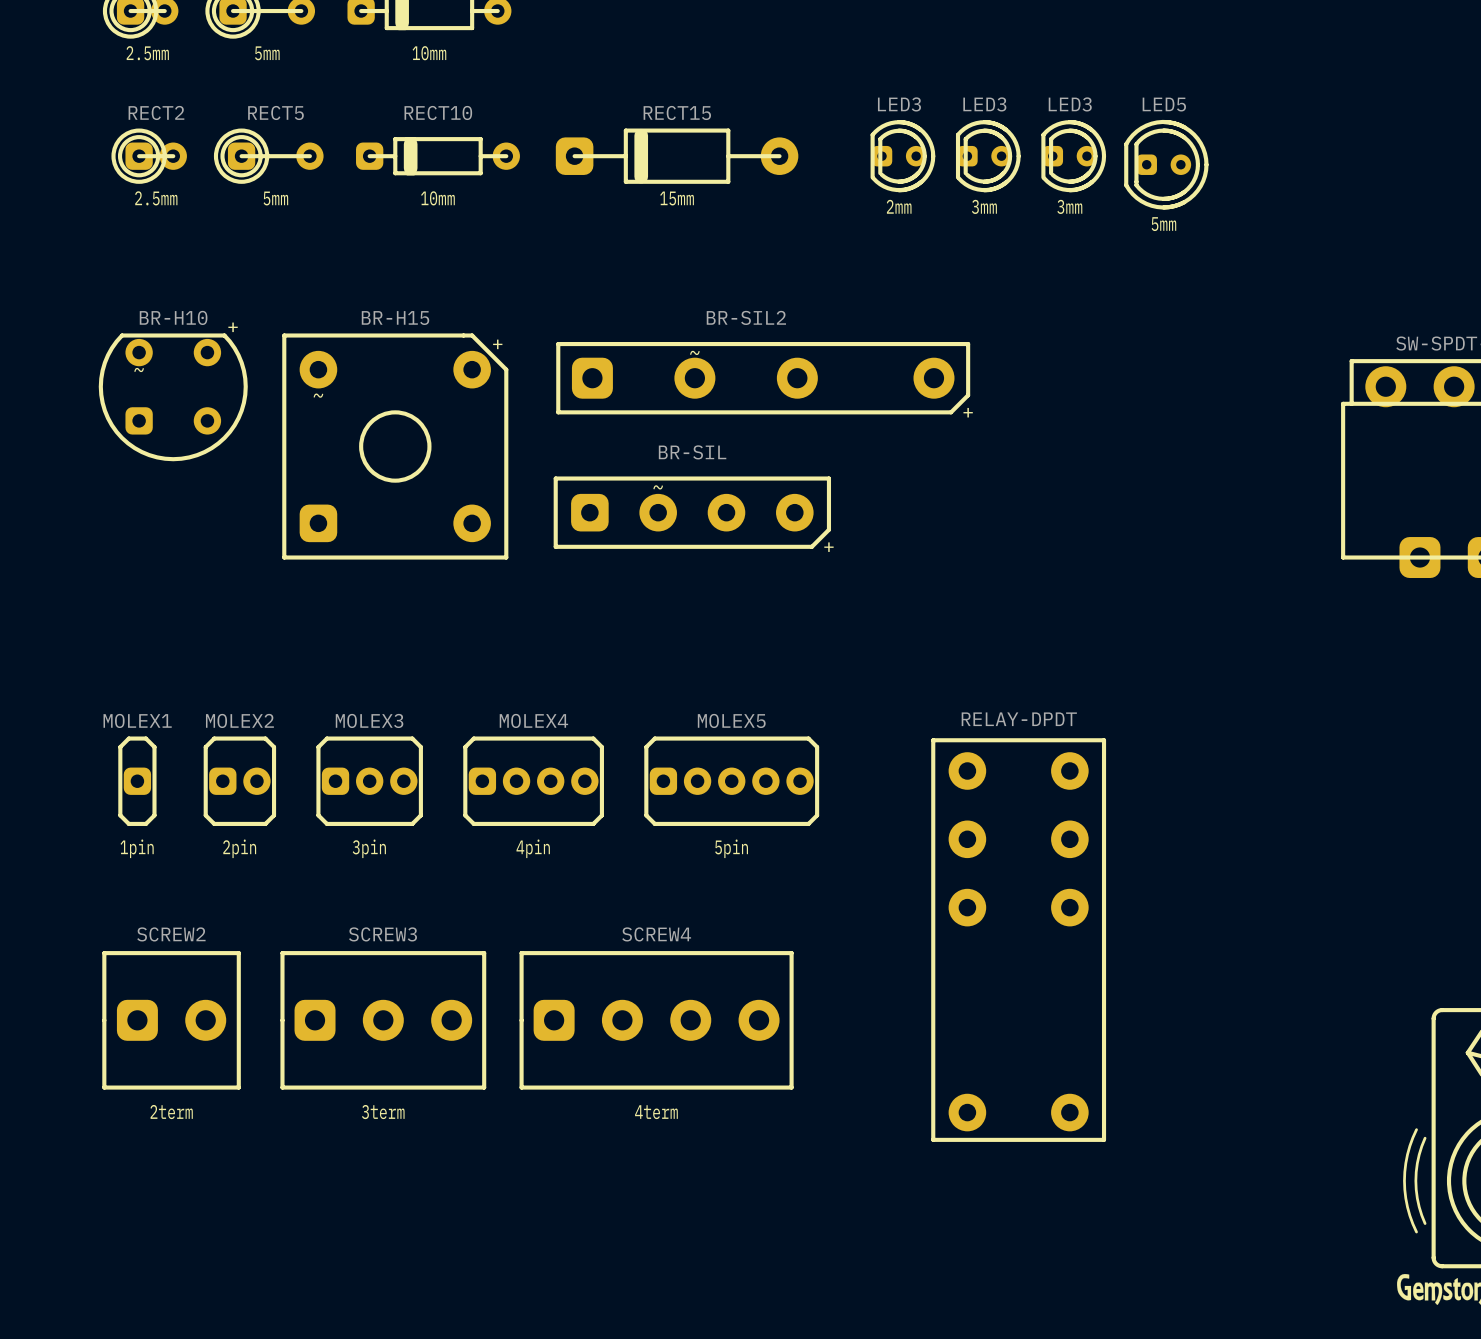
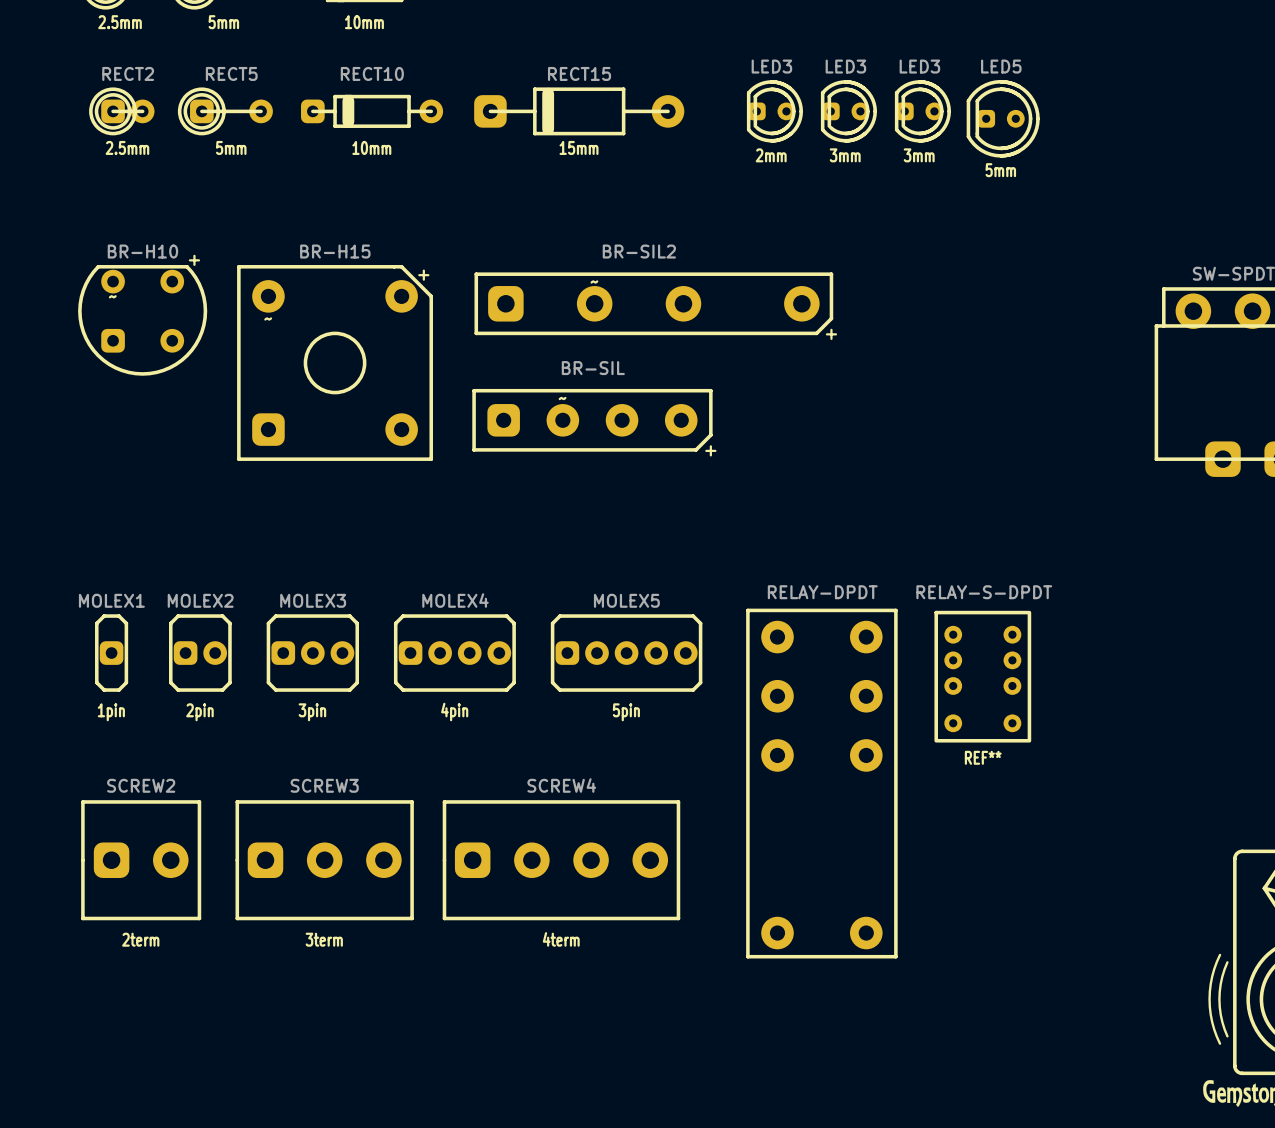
REF**: none -> RELAY-S-DPDT (982, 676)
part position: (1018, 940) -> (821, 783)

